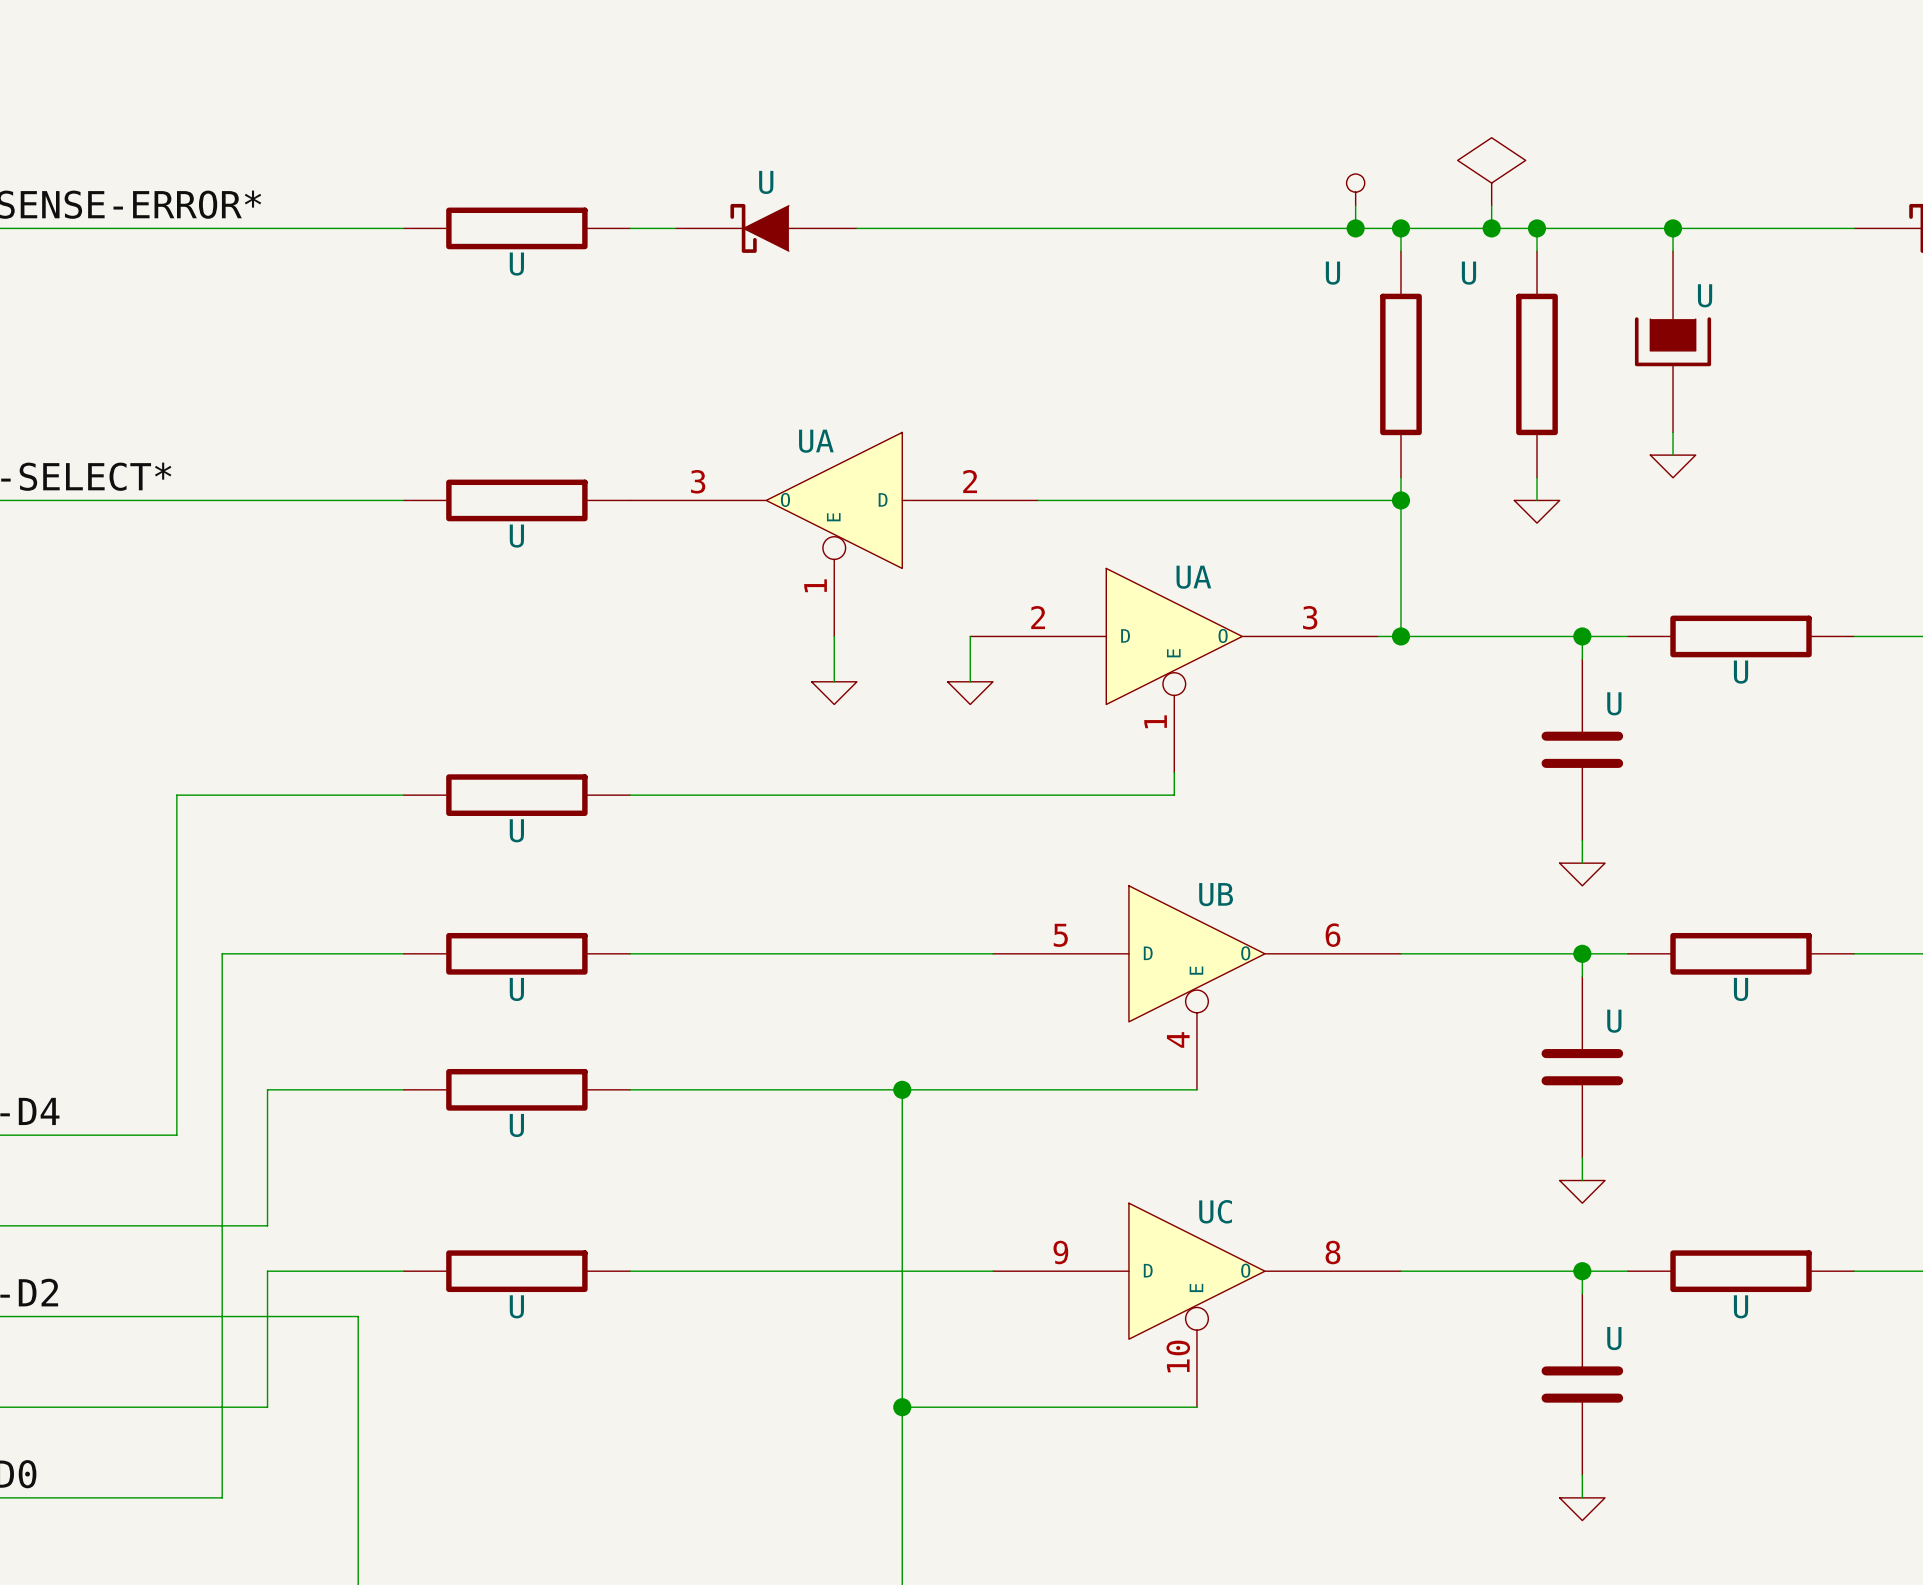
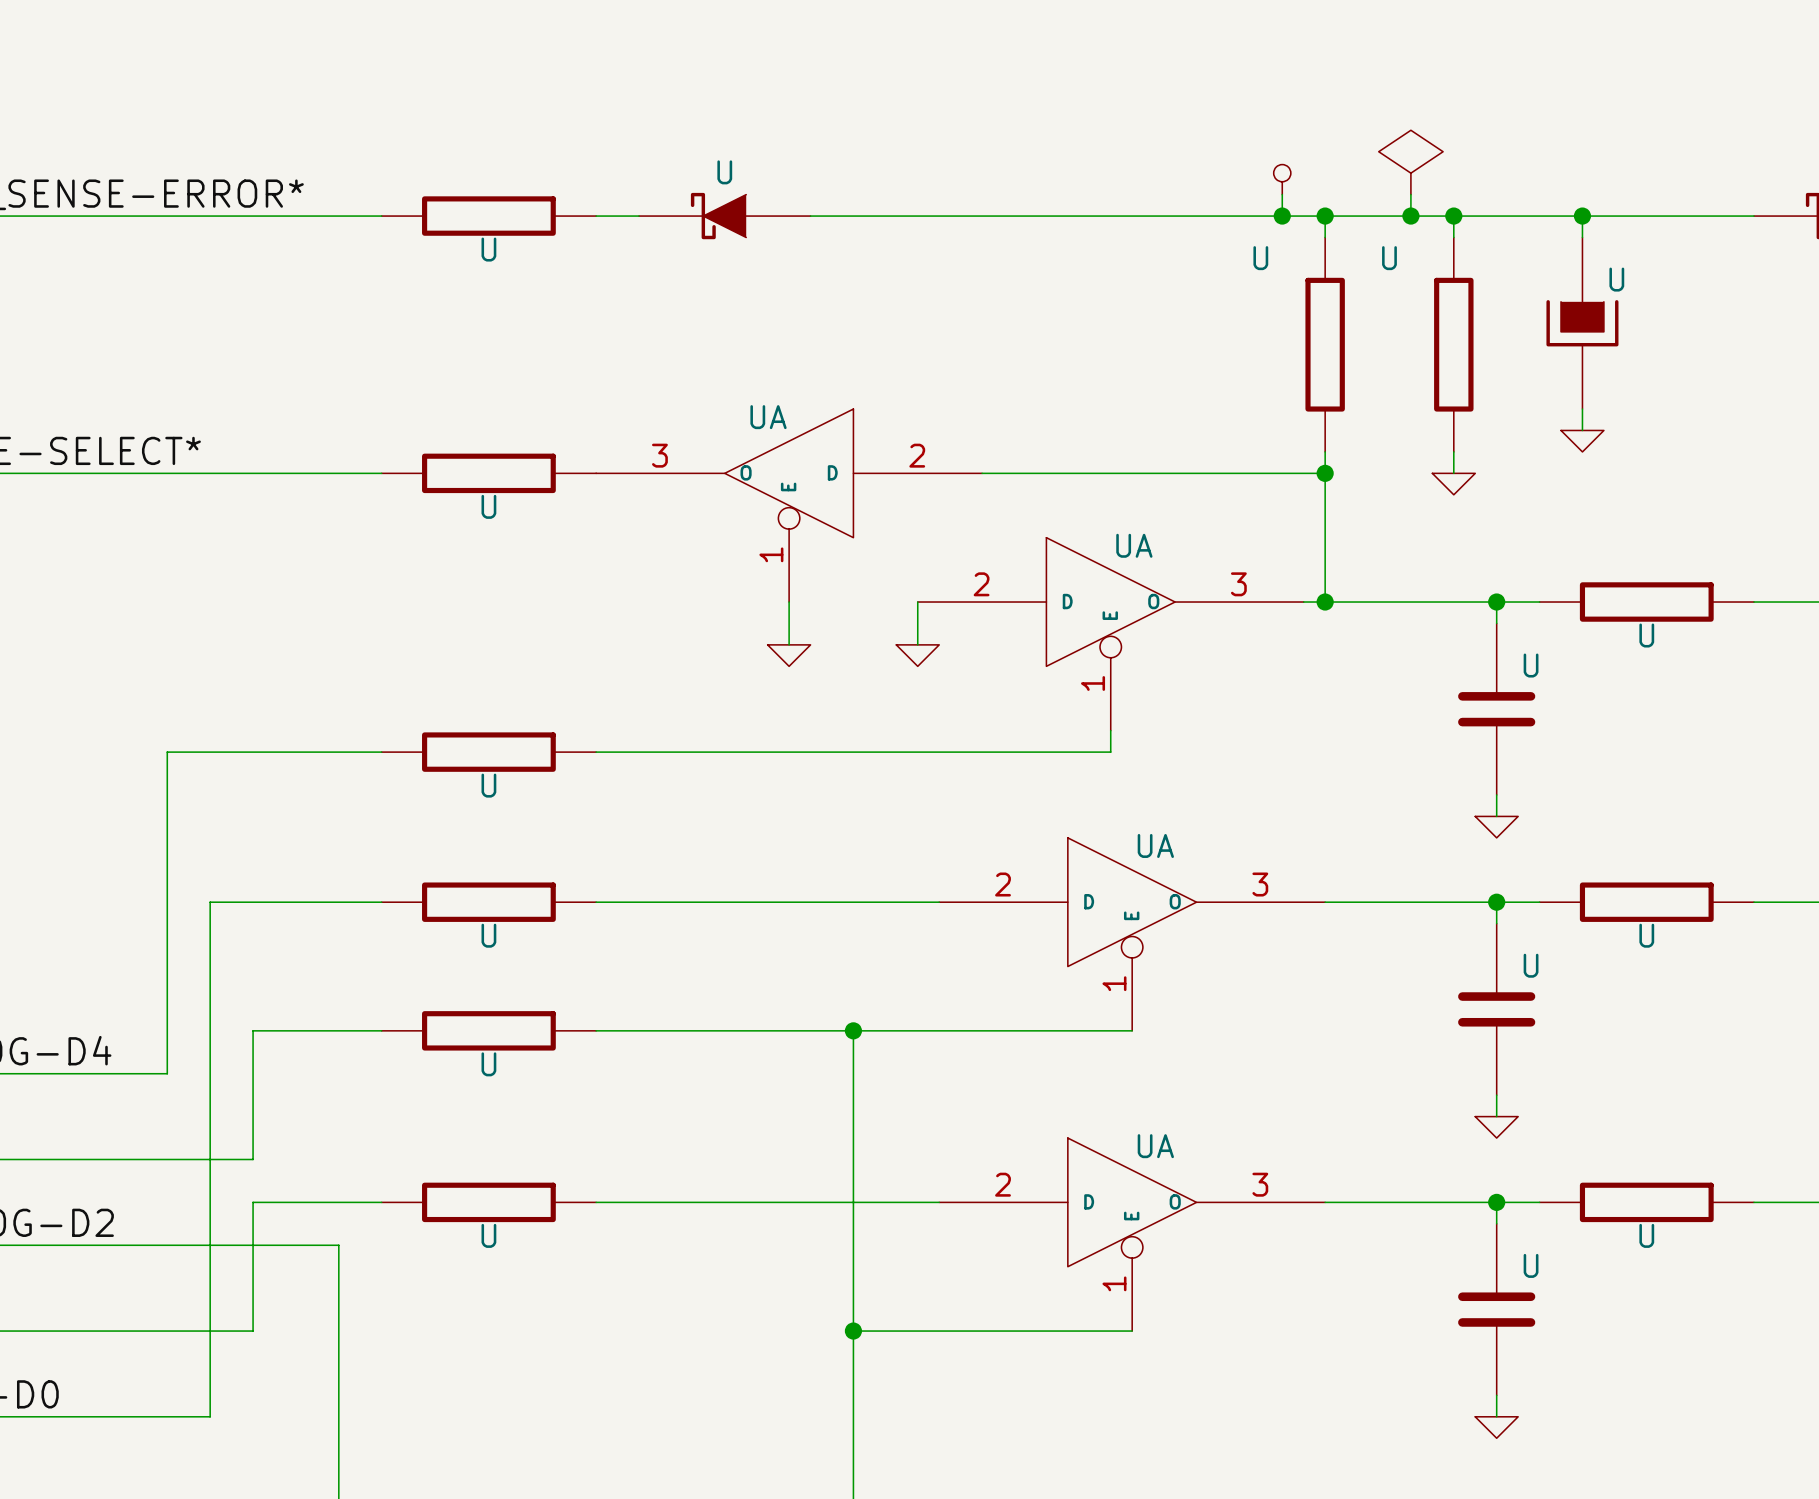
UA symbol: [630, 432, 1039, 637] -> [596, 409, 983, 603]
UA symbol: [970, 568, 1379, 773] -> [917, 537, 1304, 731]
UB: (1196, 987) -> none
UA: none -> (1132, 934)
UC: (1196, 1305) -> none
UA: none -> (1132, 1234)

